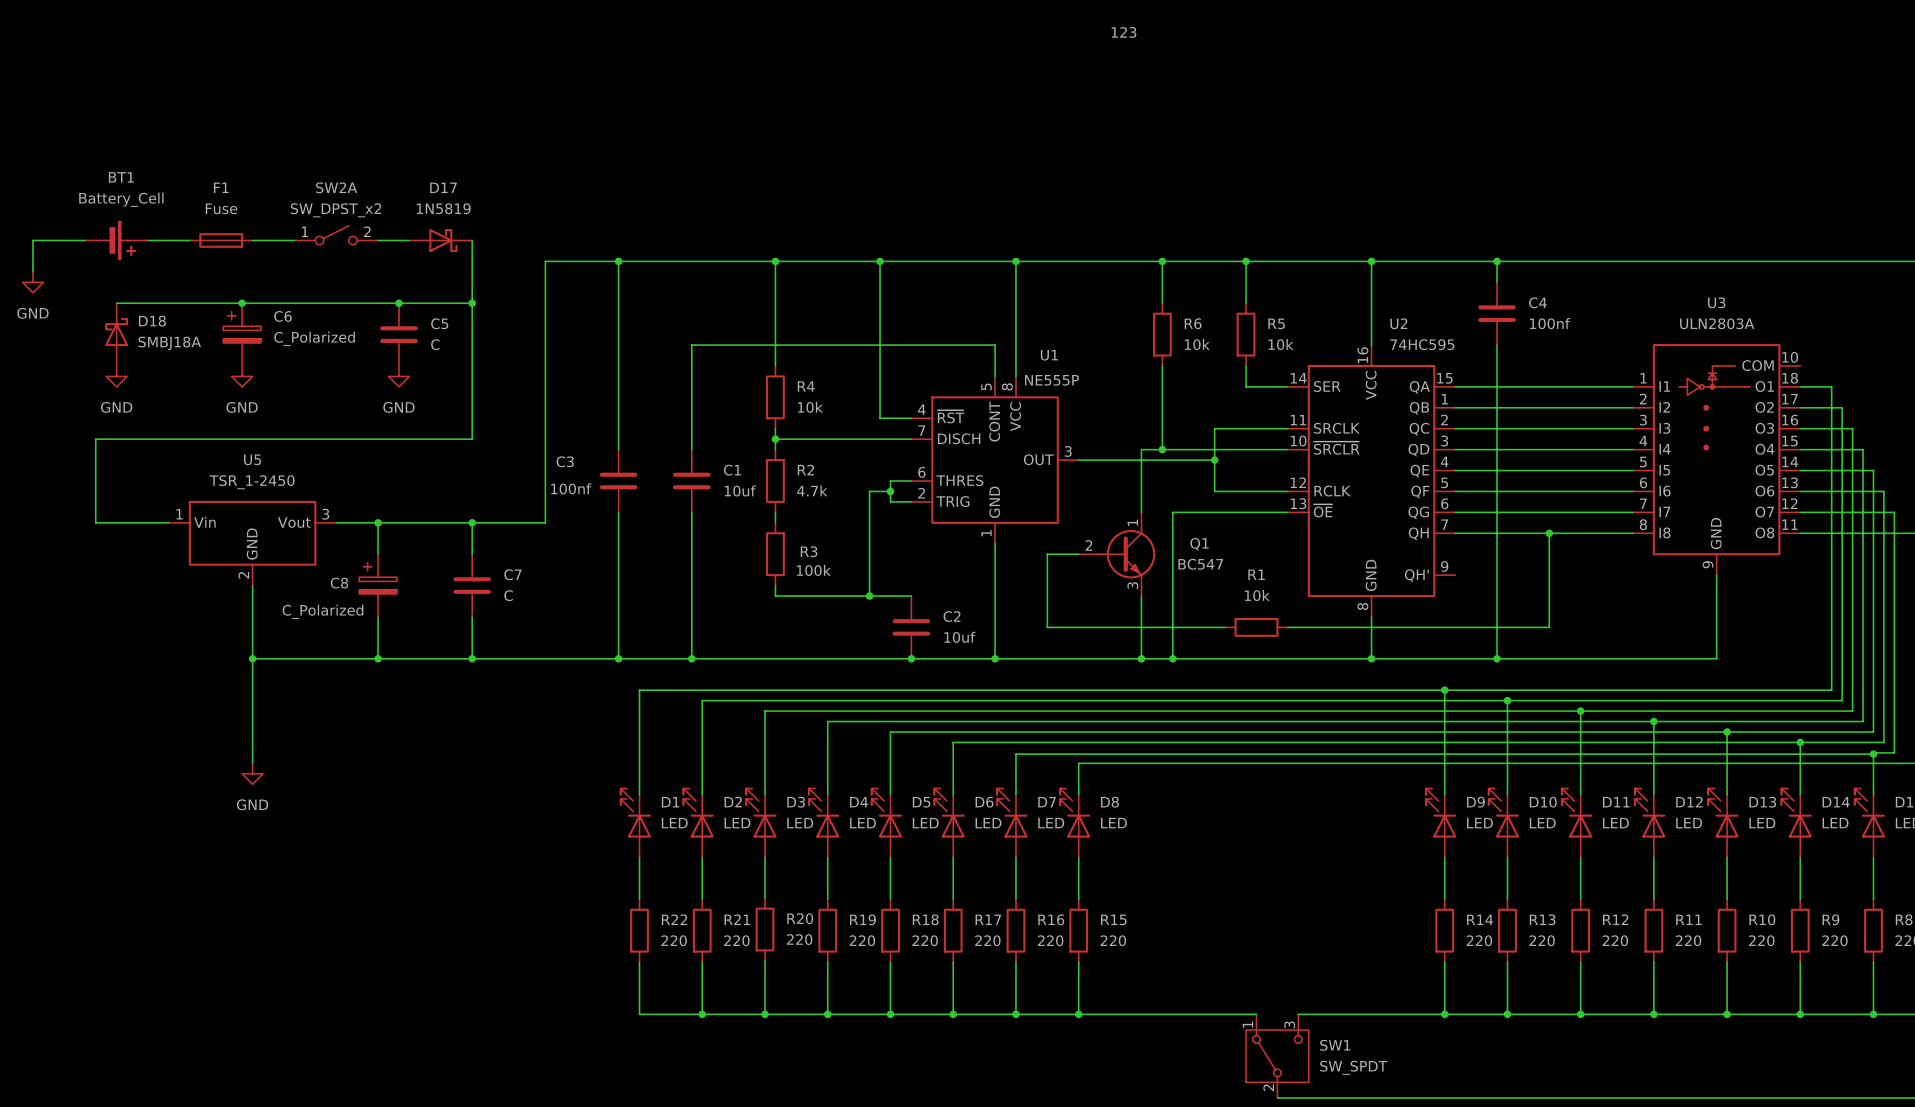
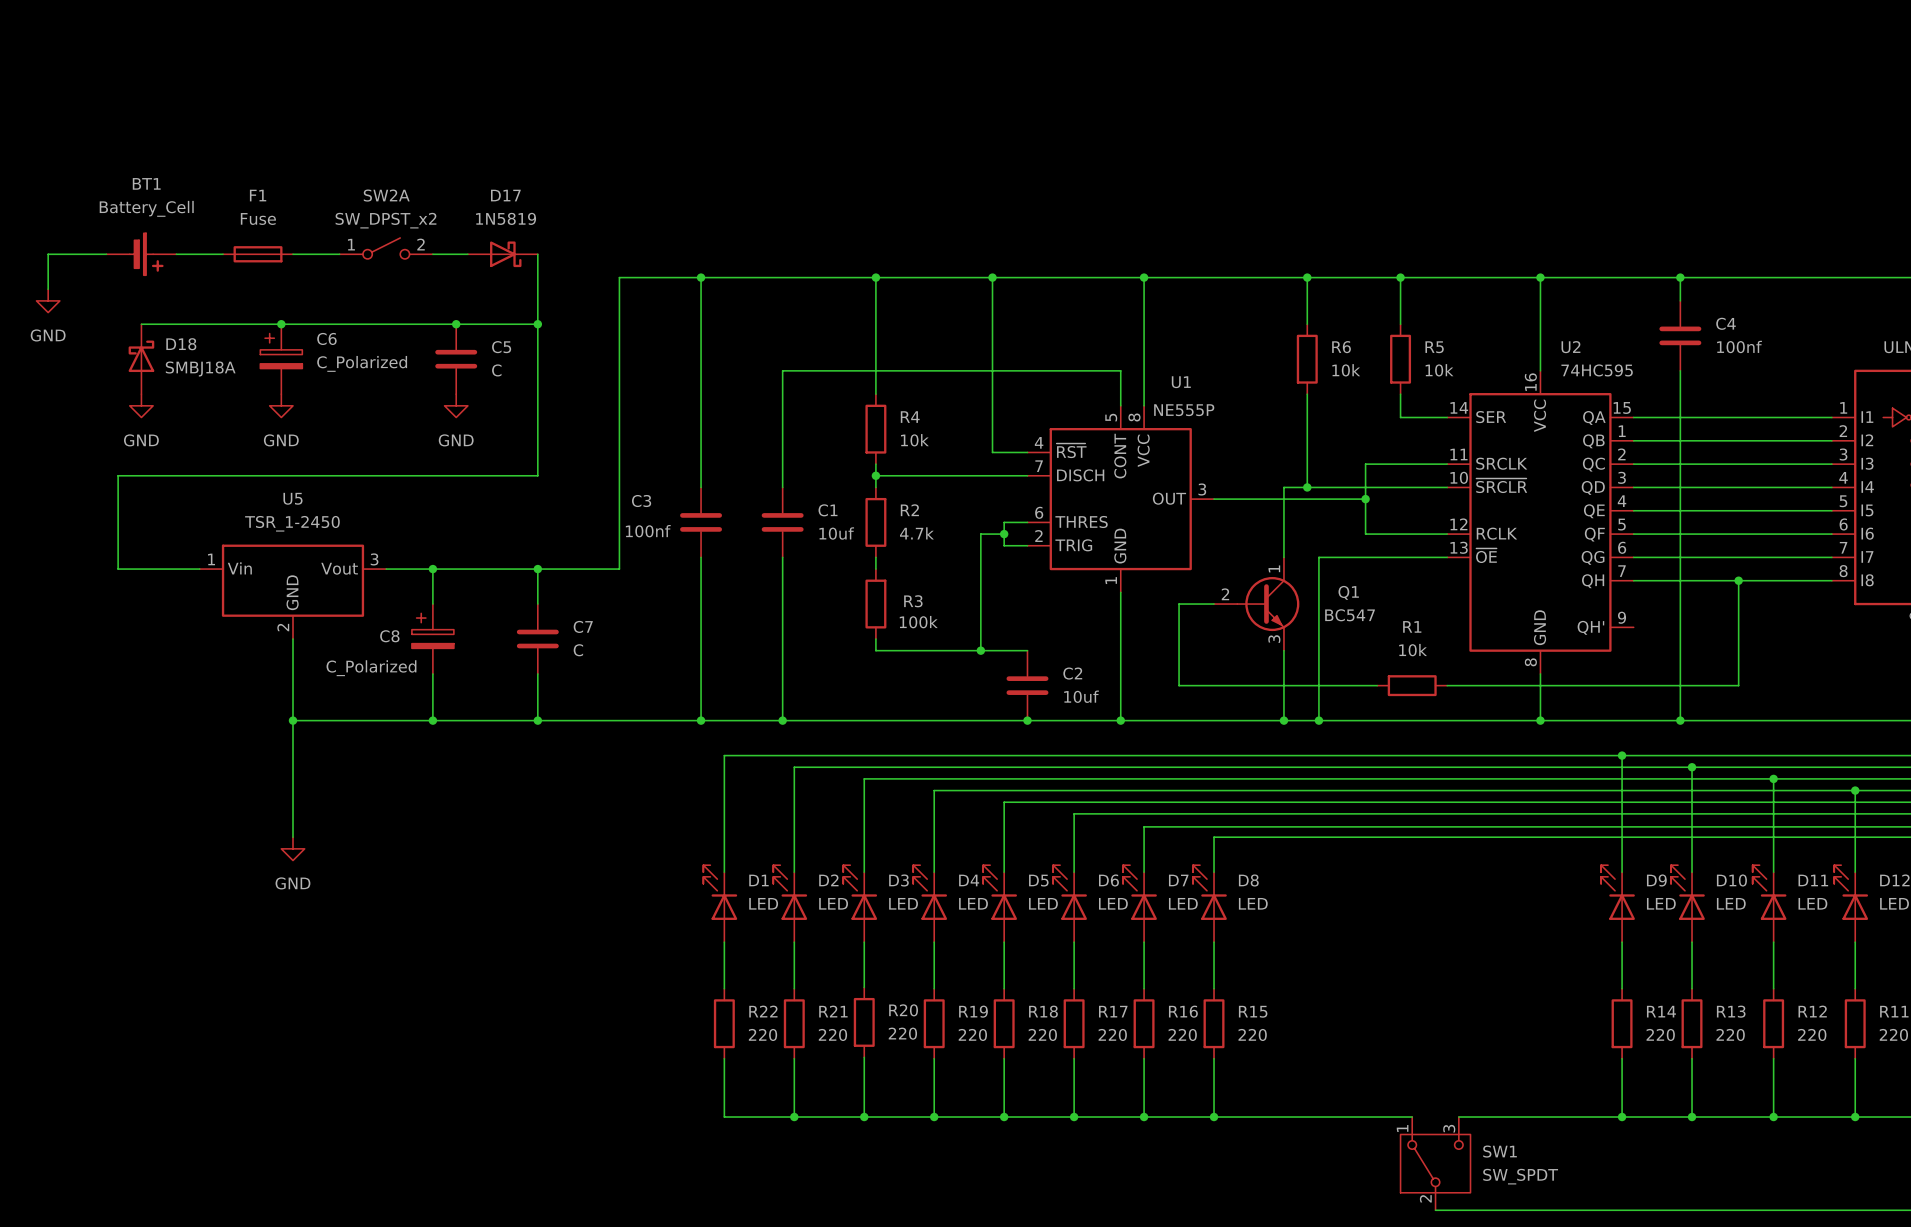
label: 123 (1123, 32) -> none

